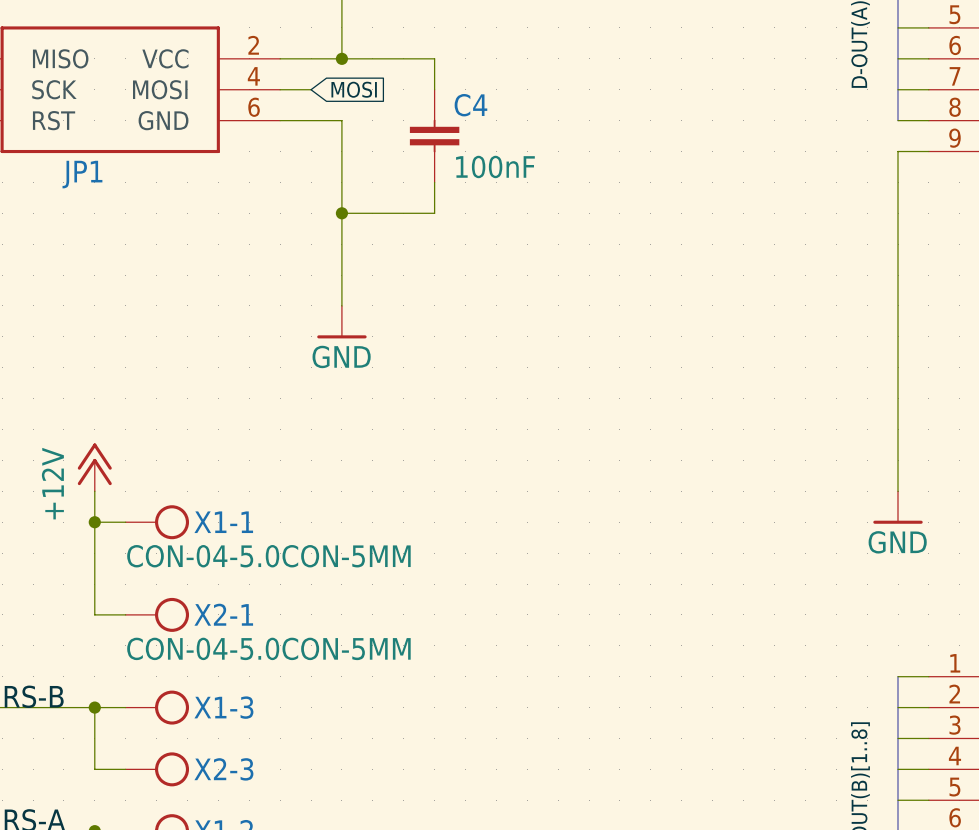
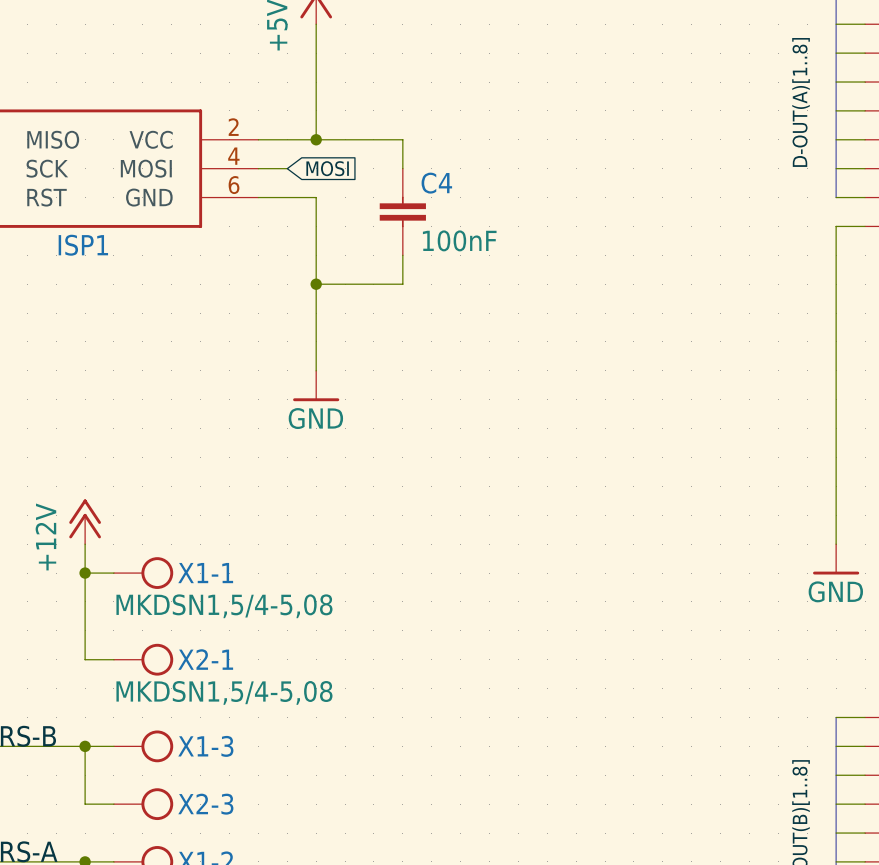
JP1 name: JP1 (82, 174) -> ISP1 (83, 245)
X1-1 value: CON-04-5.0CON-5MM (268, 556) -> MKDSN1,5/4-5,08 (224, 606)
X2-1 value: CON-04-5.0CON-5MM (268, 648) -> MKDSN1,5/4-5,08 (224, 692)

